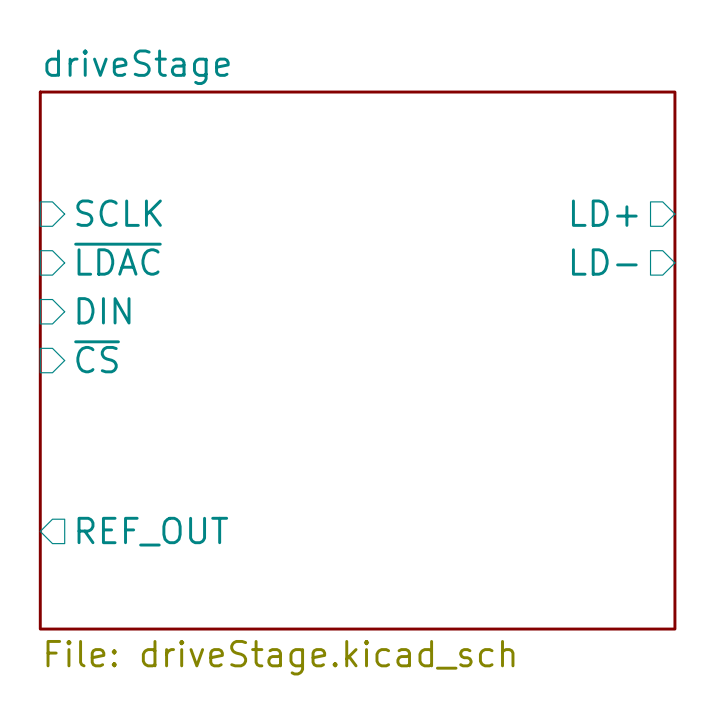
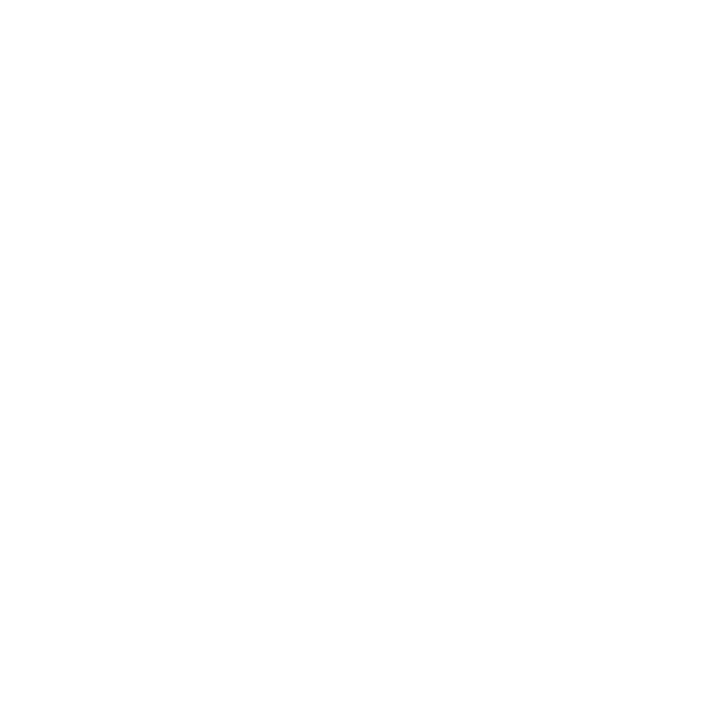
sheet pin: SCLK (119, 213) -> none
sheet pin: LD+ (604, 213) -> none
sheet pin: ~{LDAC} (117, 259) -> none
sheet pin: LD- (604, 261) -> none
sheet pin: DIN (104, 310) -> none
sheet pin: ~{CS} (97, 356) -> none
sheet driveStage: File: driveStage.kicad_sch (357, 360) -> none
sheet pin: REF_OUT (152, 531) -> none

